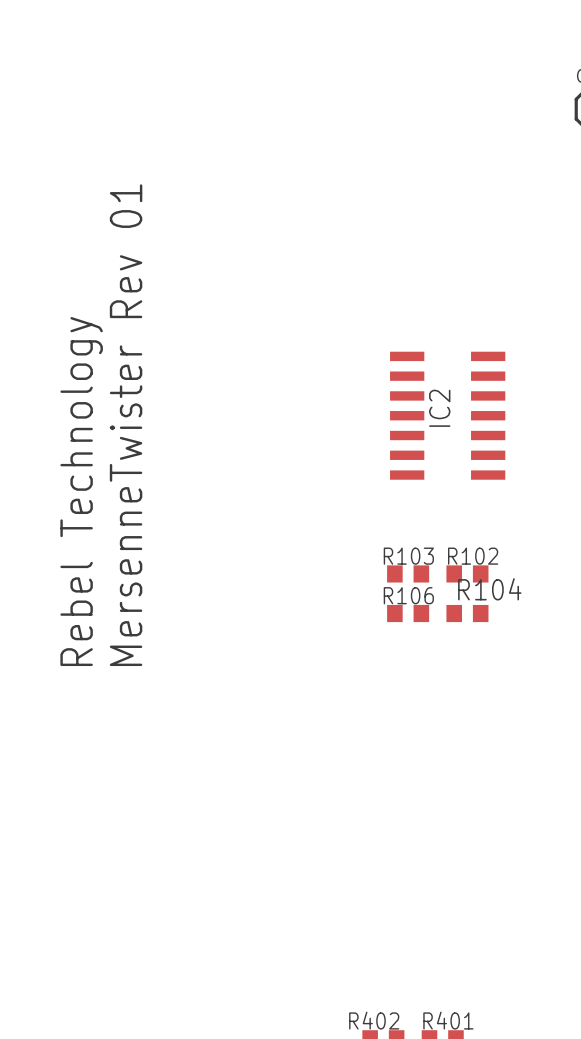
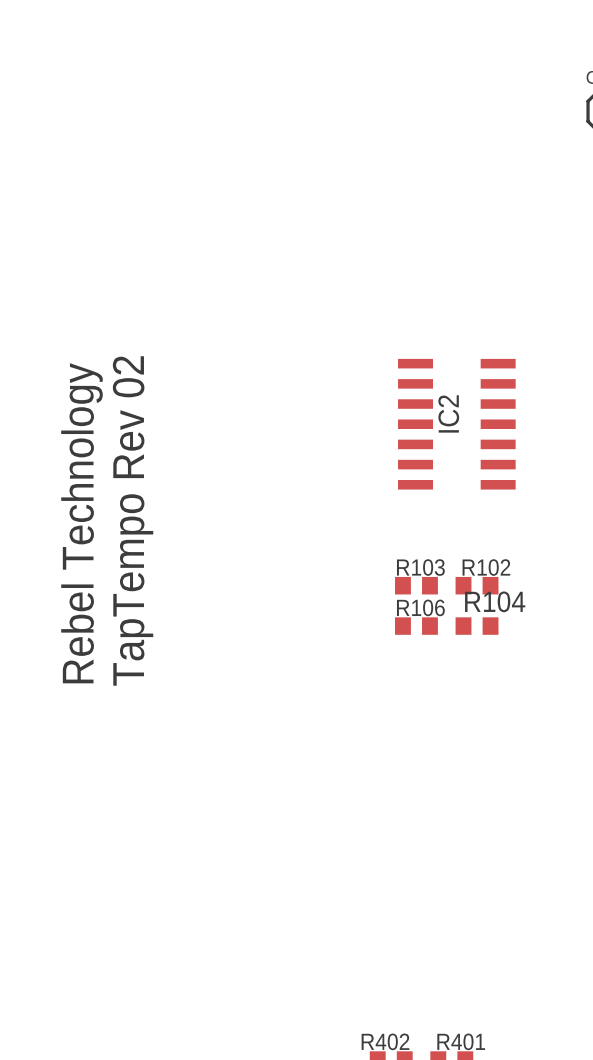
text: MersenneTwister Rev 01 (126, 425) -> TapTempo Rev 02 (133, 520)

